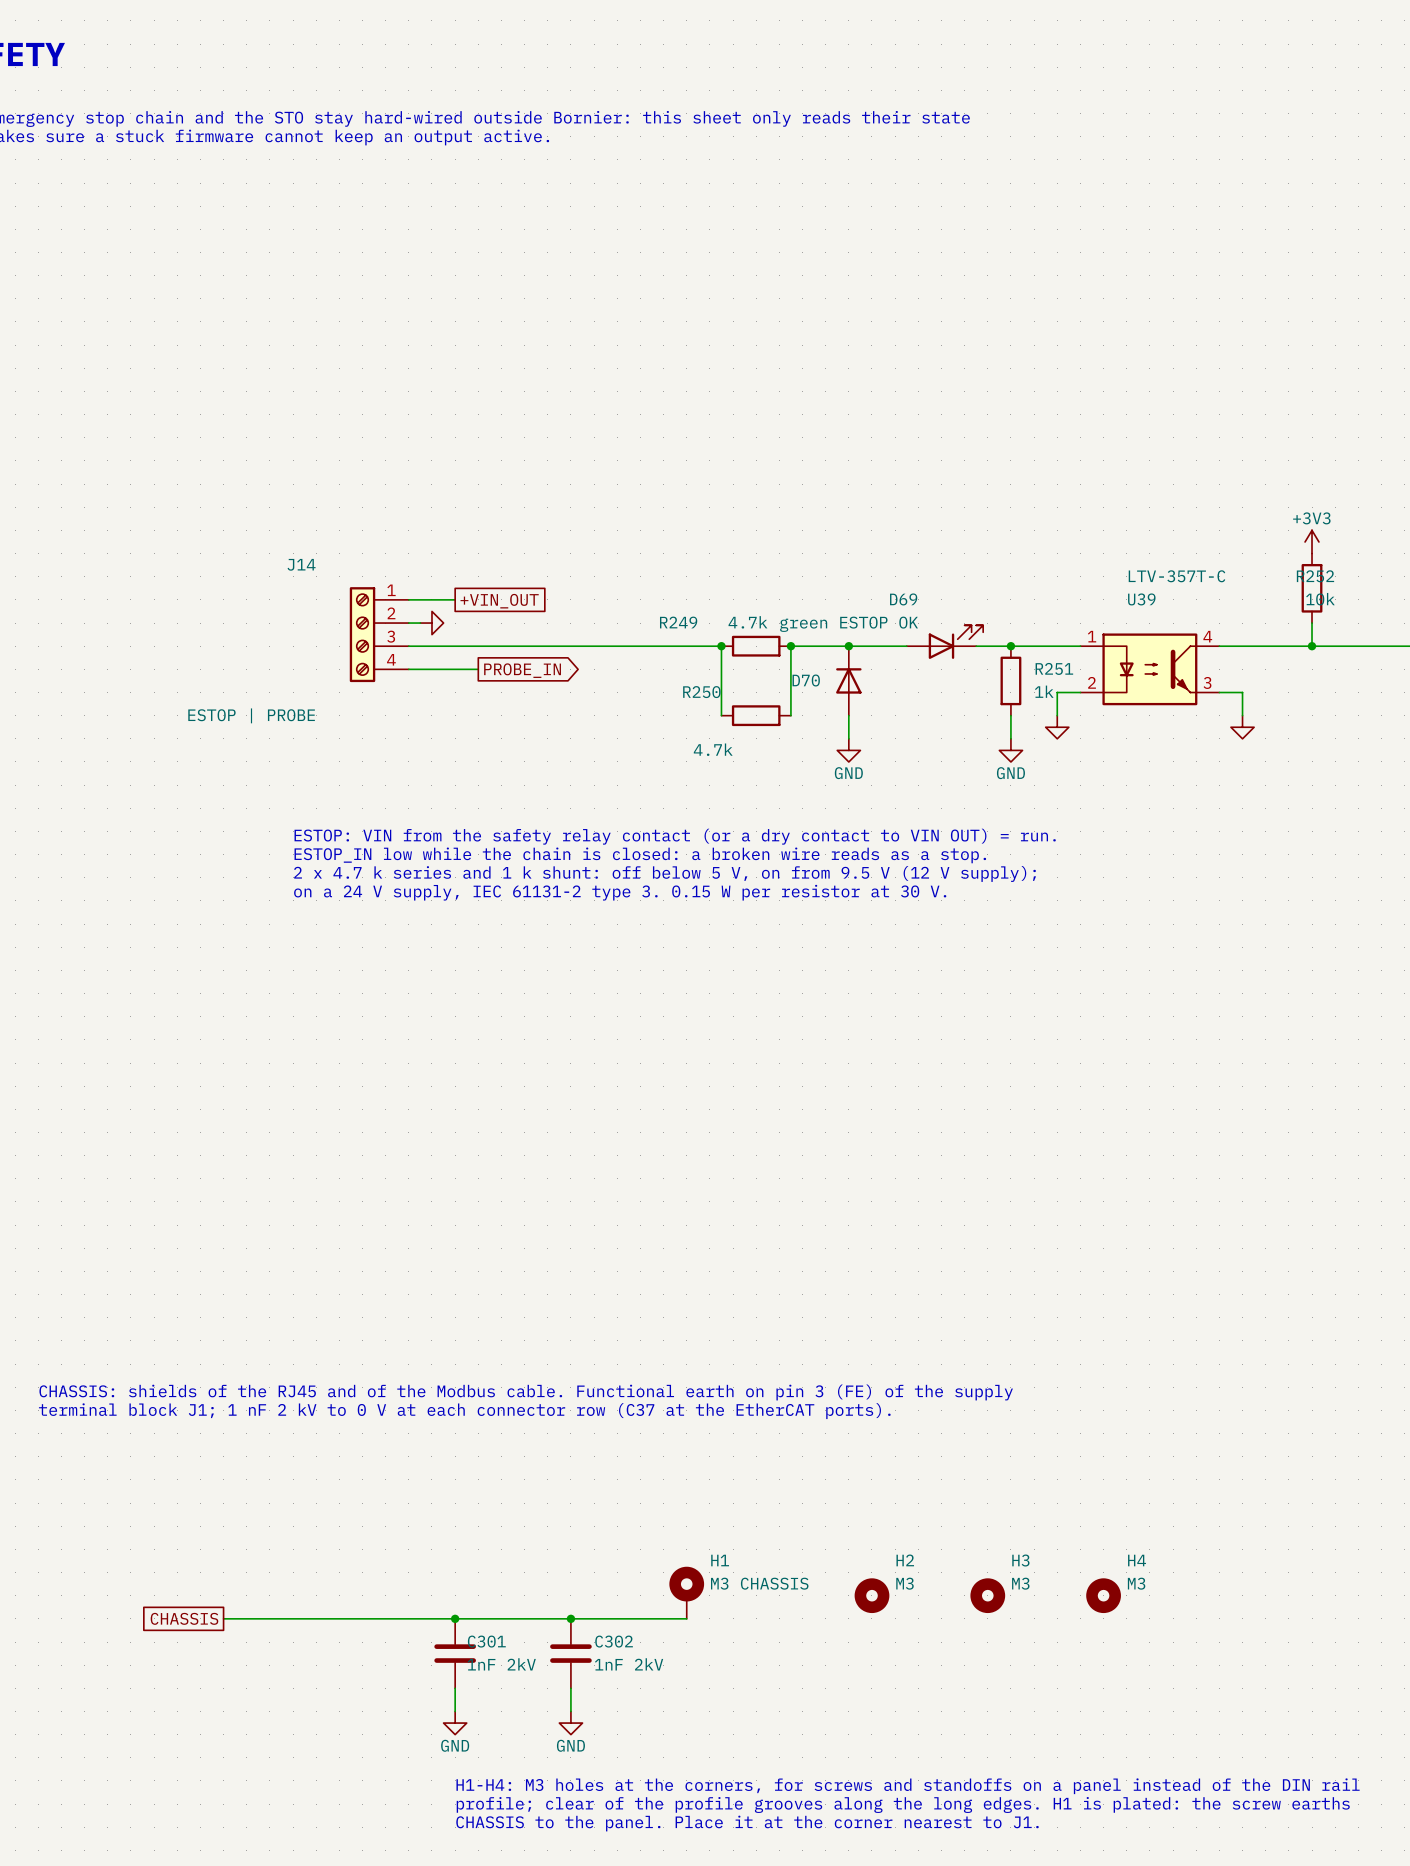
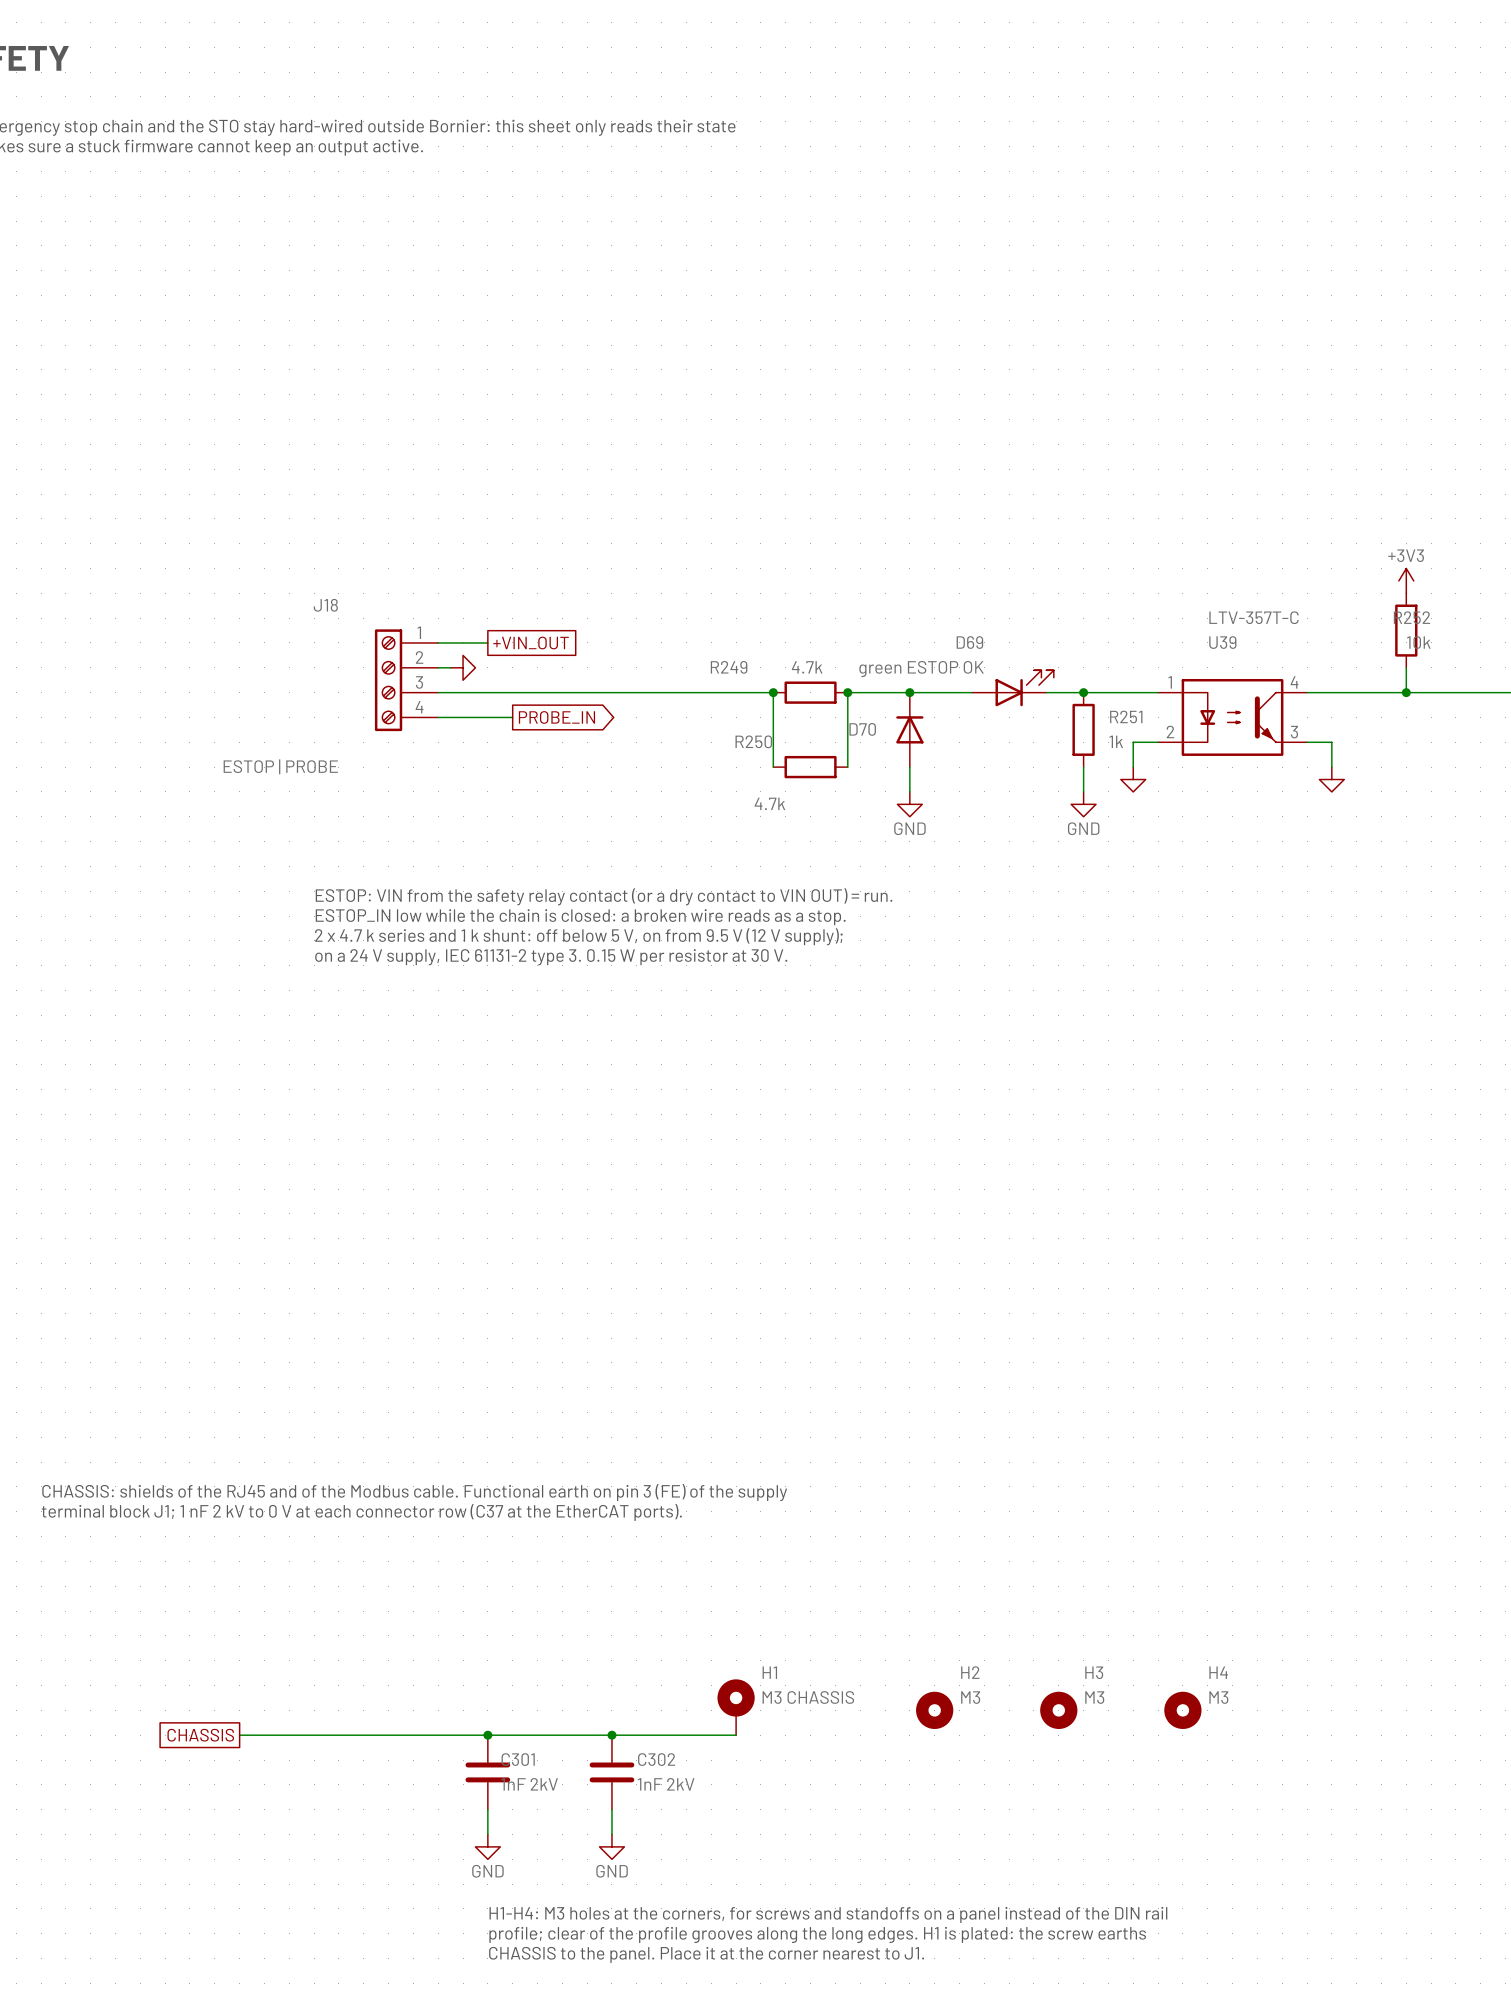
J14 name: J14 (301, 564) -> J18 (325, 605)

